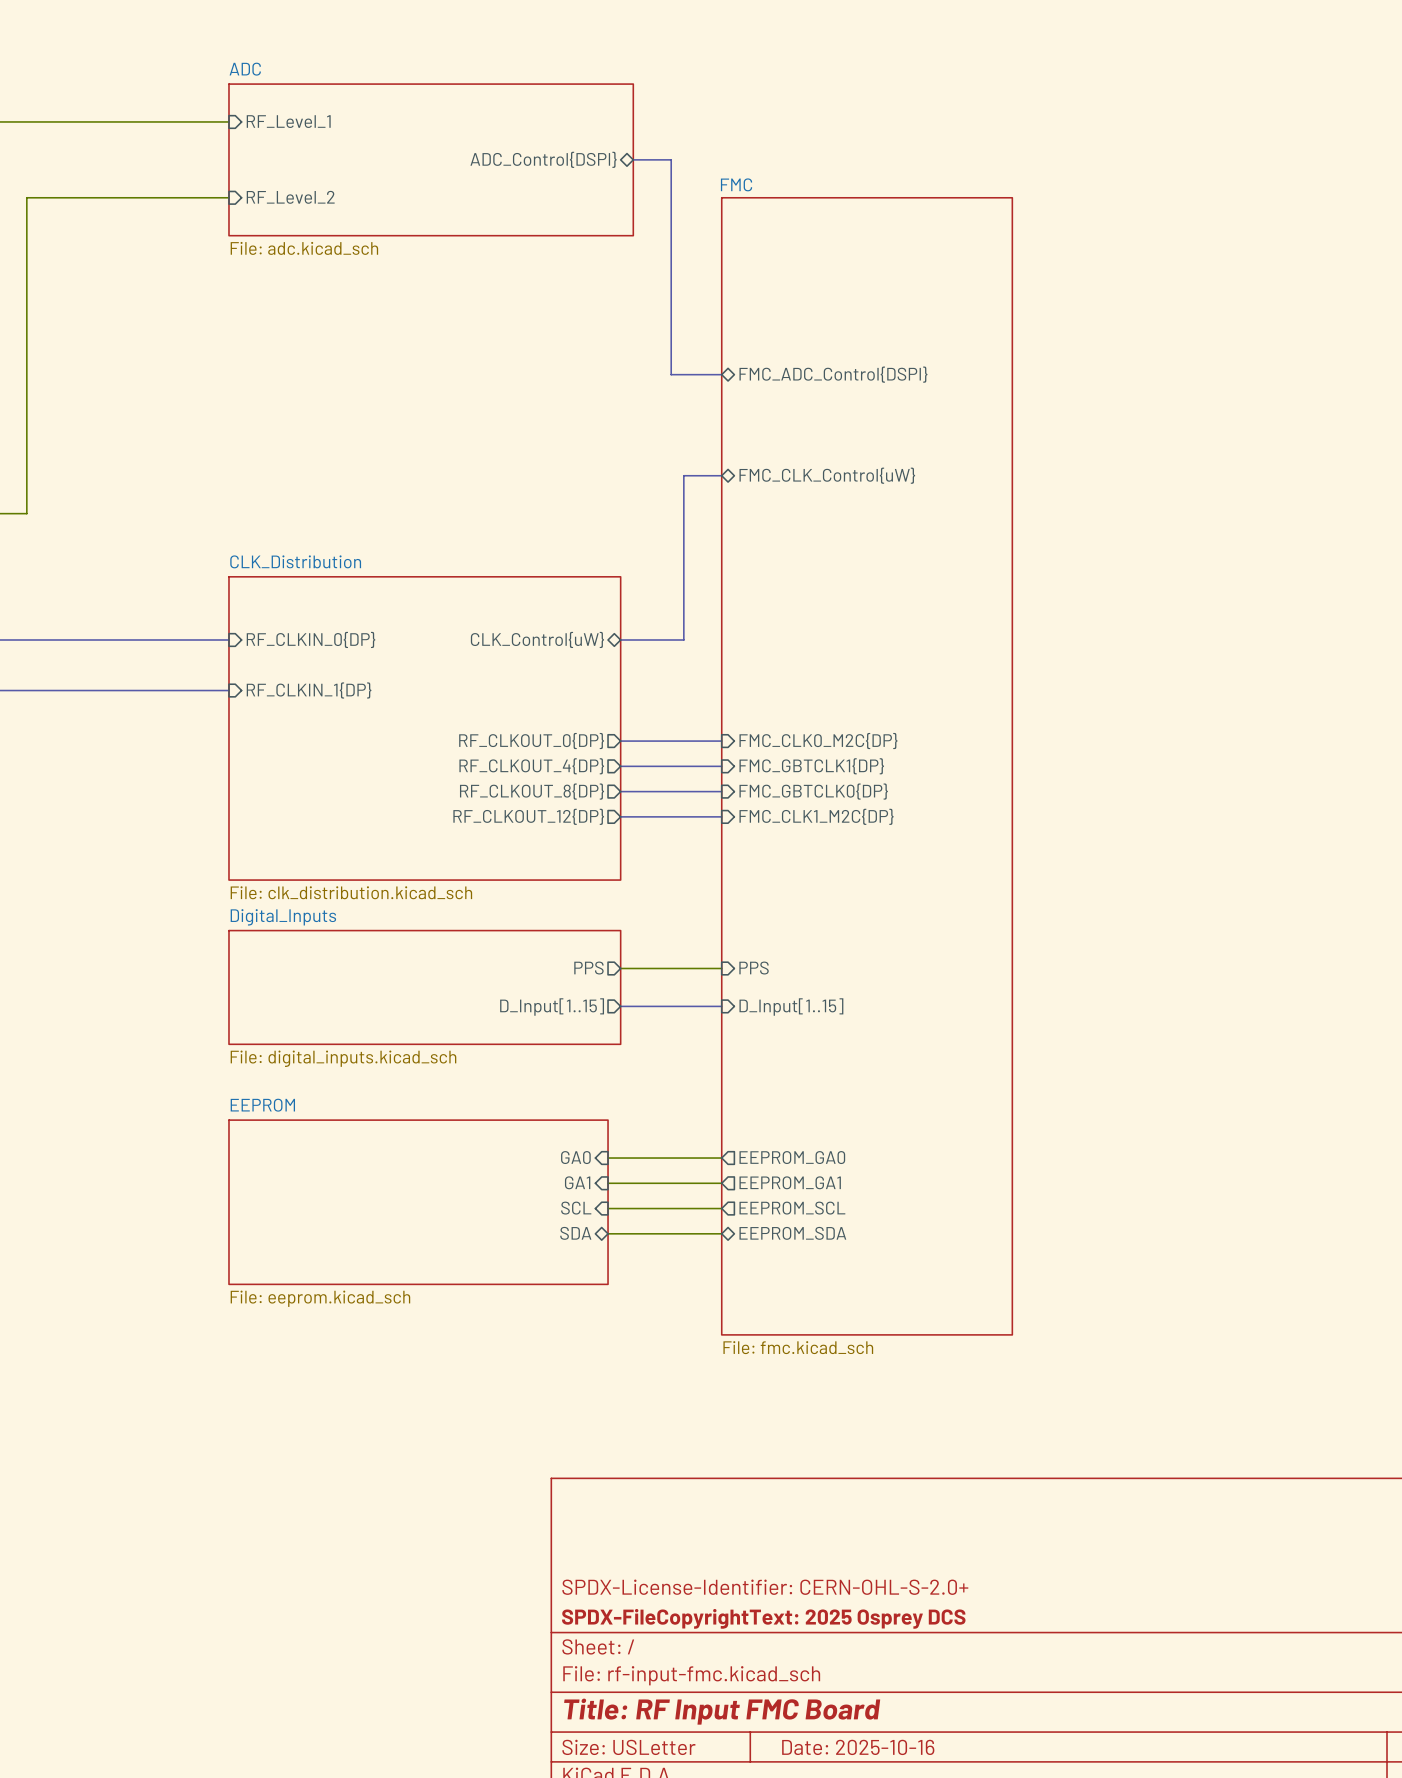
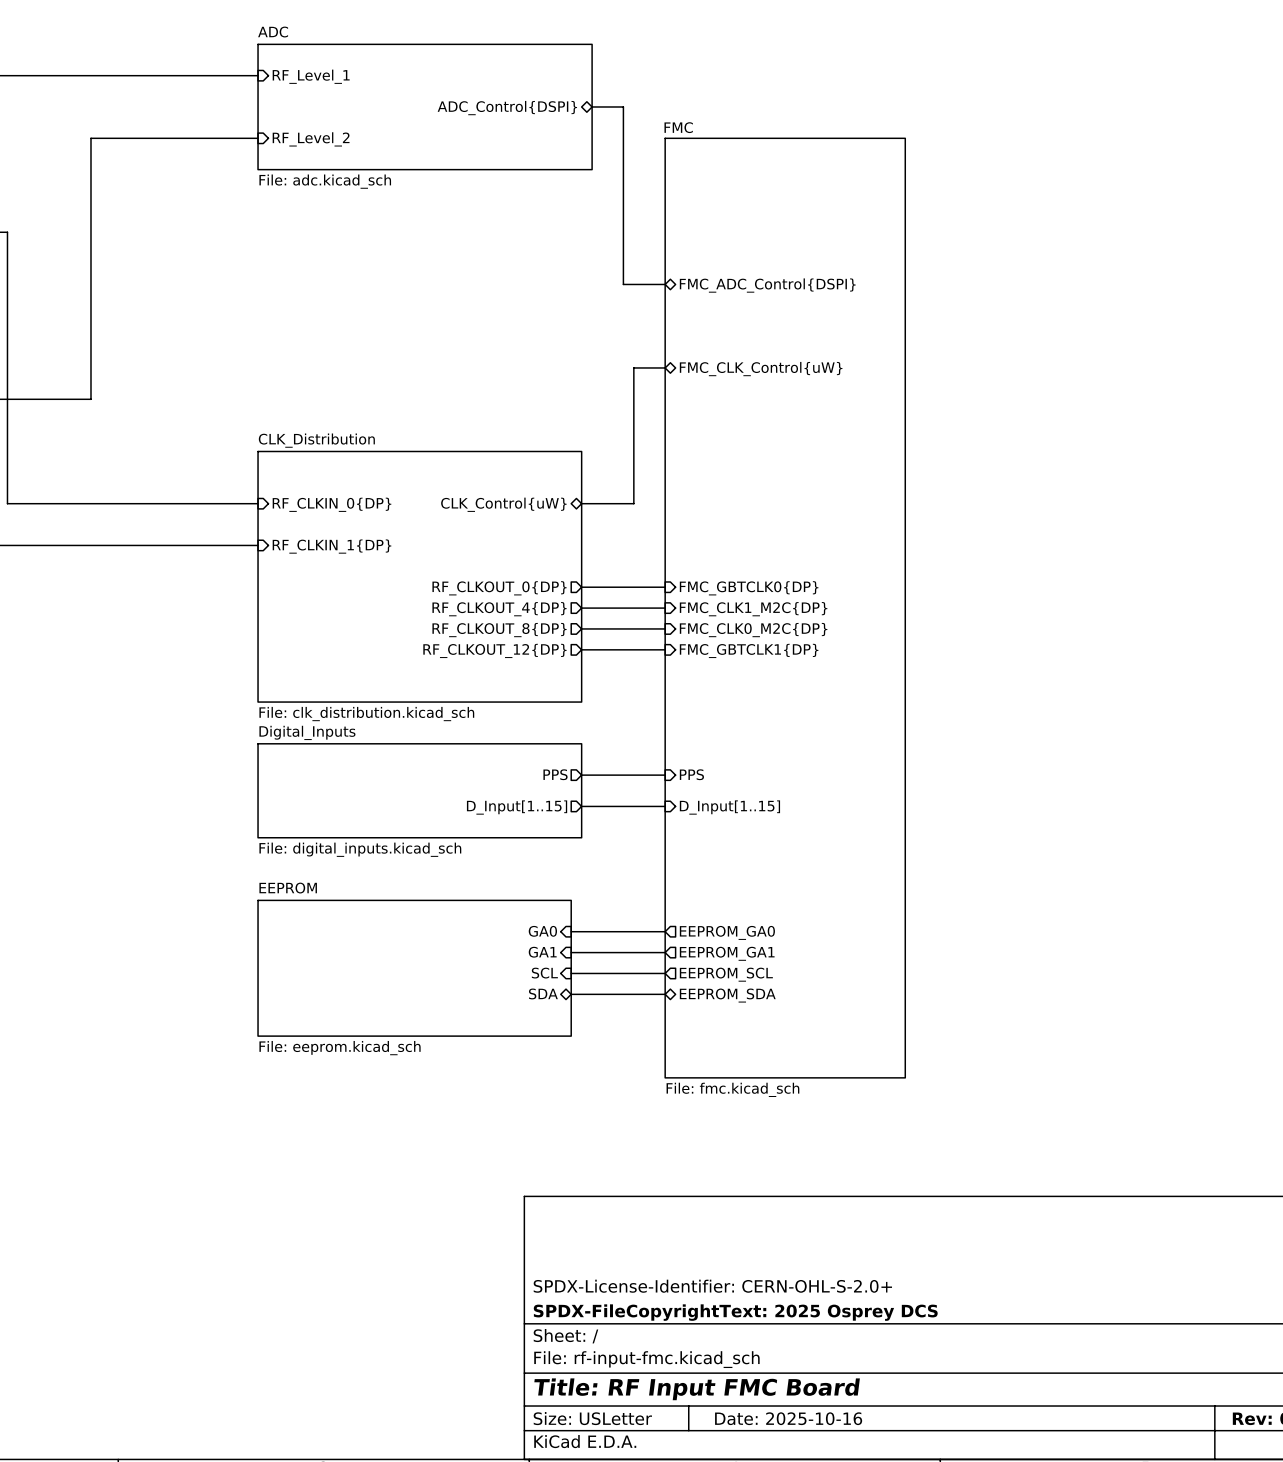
sheet pin: FMC_CLK0_M2C{DP} (818, 741) -> FMC_GBTCLK0{DP} (749, 588)
sheet pin: FMC_GBTCLK1{DP} (811, 766) -> FMC_CLK1_M2C{DP} (753, 609)
sheet pin: FMC_GBTCLK0{DP} (813, 791) -> FMC_CLK0_M2C{DP} (753, 630)
sheet pin: FMC_CLK1_M2C{DP} (816, 816) -> FMC_GBTCLK1{DP} (749, 650)

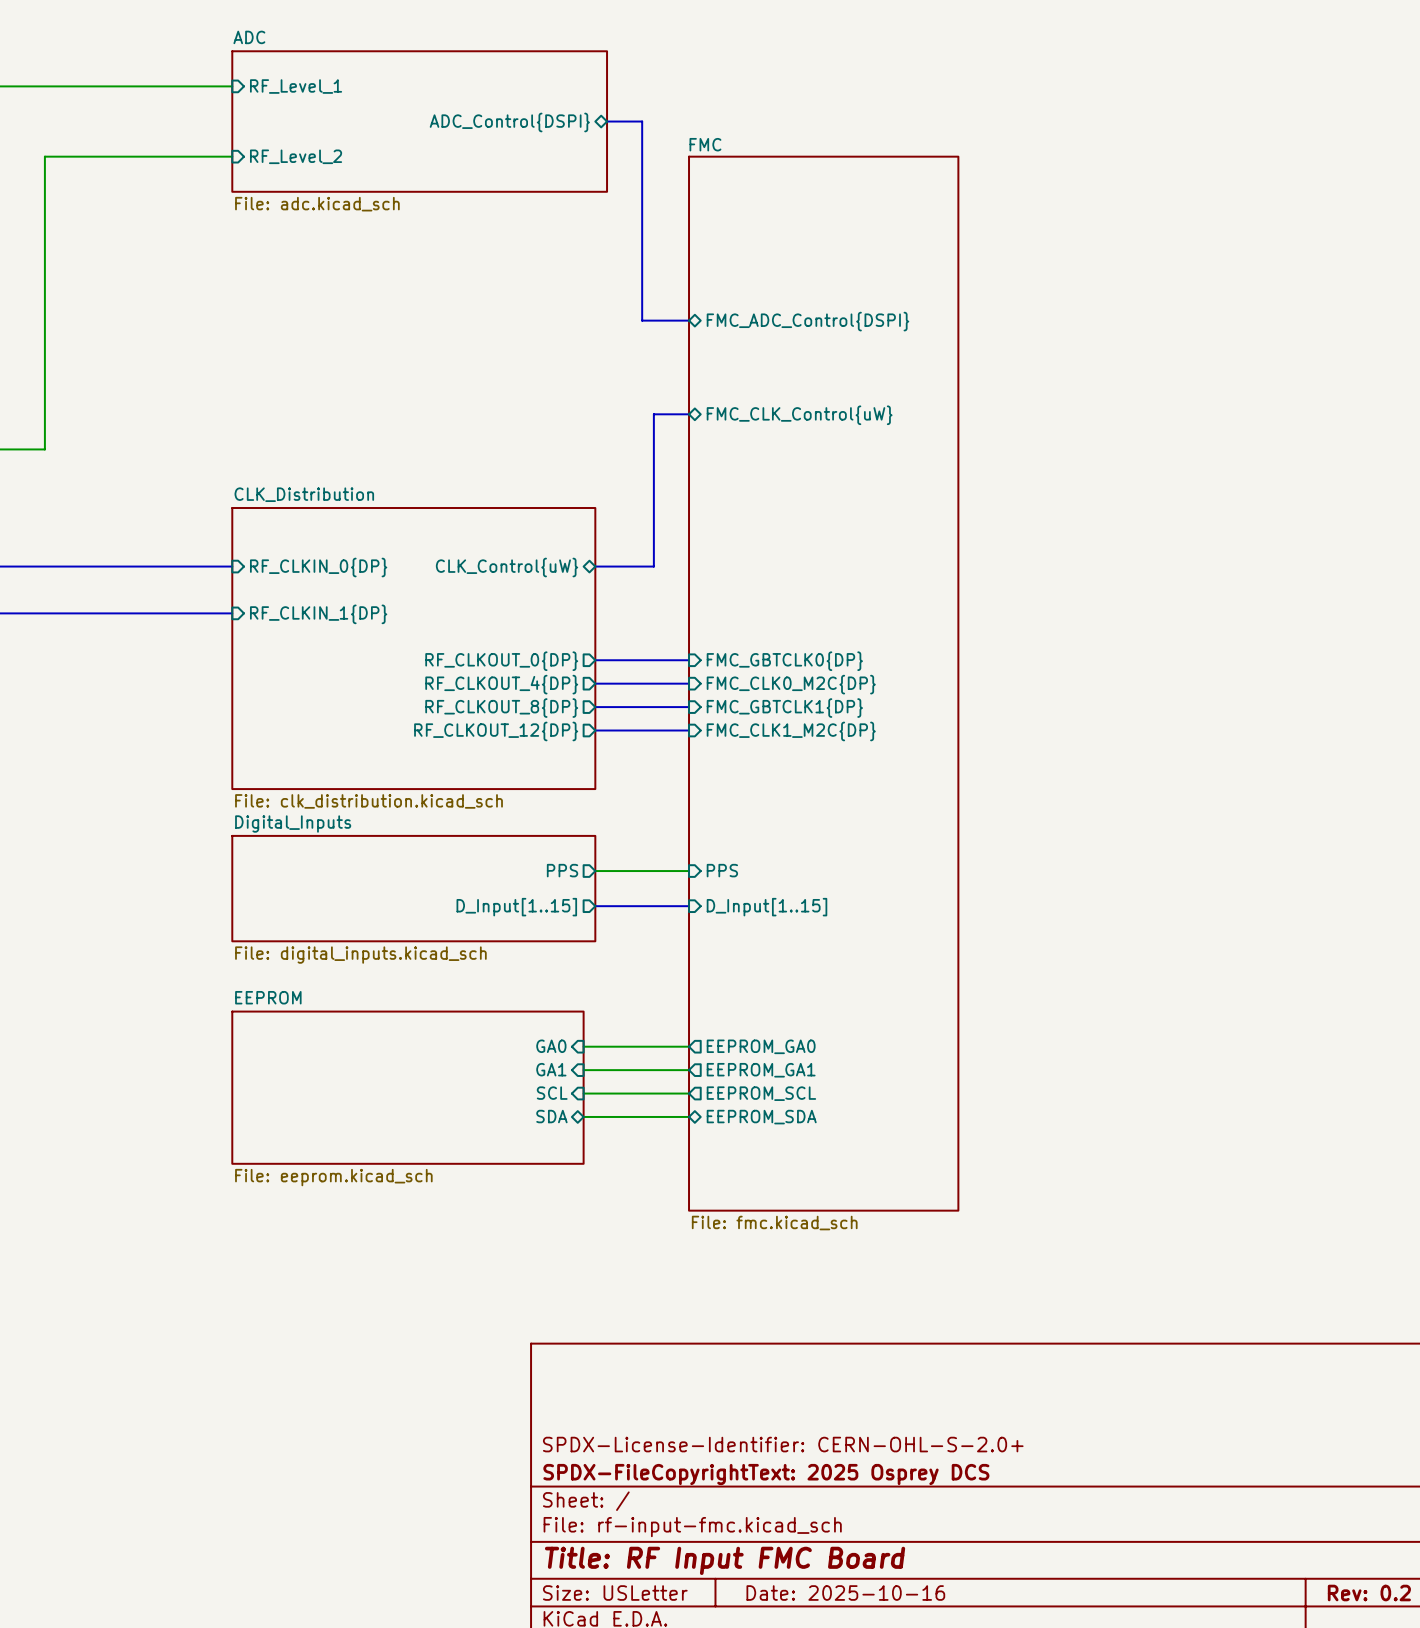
sheet pin: FMC_CLK1_M2C{DP} (753, 609) -> FMC_CLK0_M2C{DP} (791, 684)
sheet pin: FMC_CLK0_M2C{DP} (753, 630) -> FMC_GBTCLK1{DP} (784, 708)
sheet pin: FMC_GBTCLK1{DP} (749, 650) -> FMC_CLK1_M2C{DP} (791, 731)

